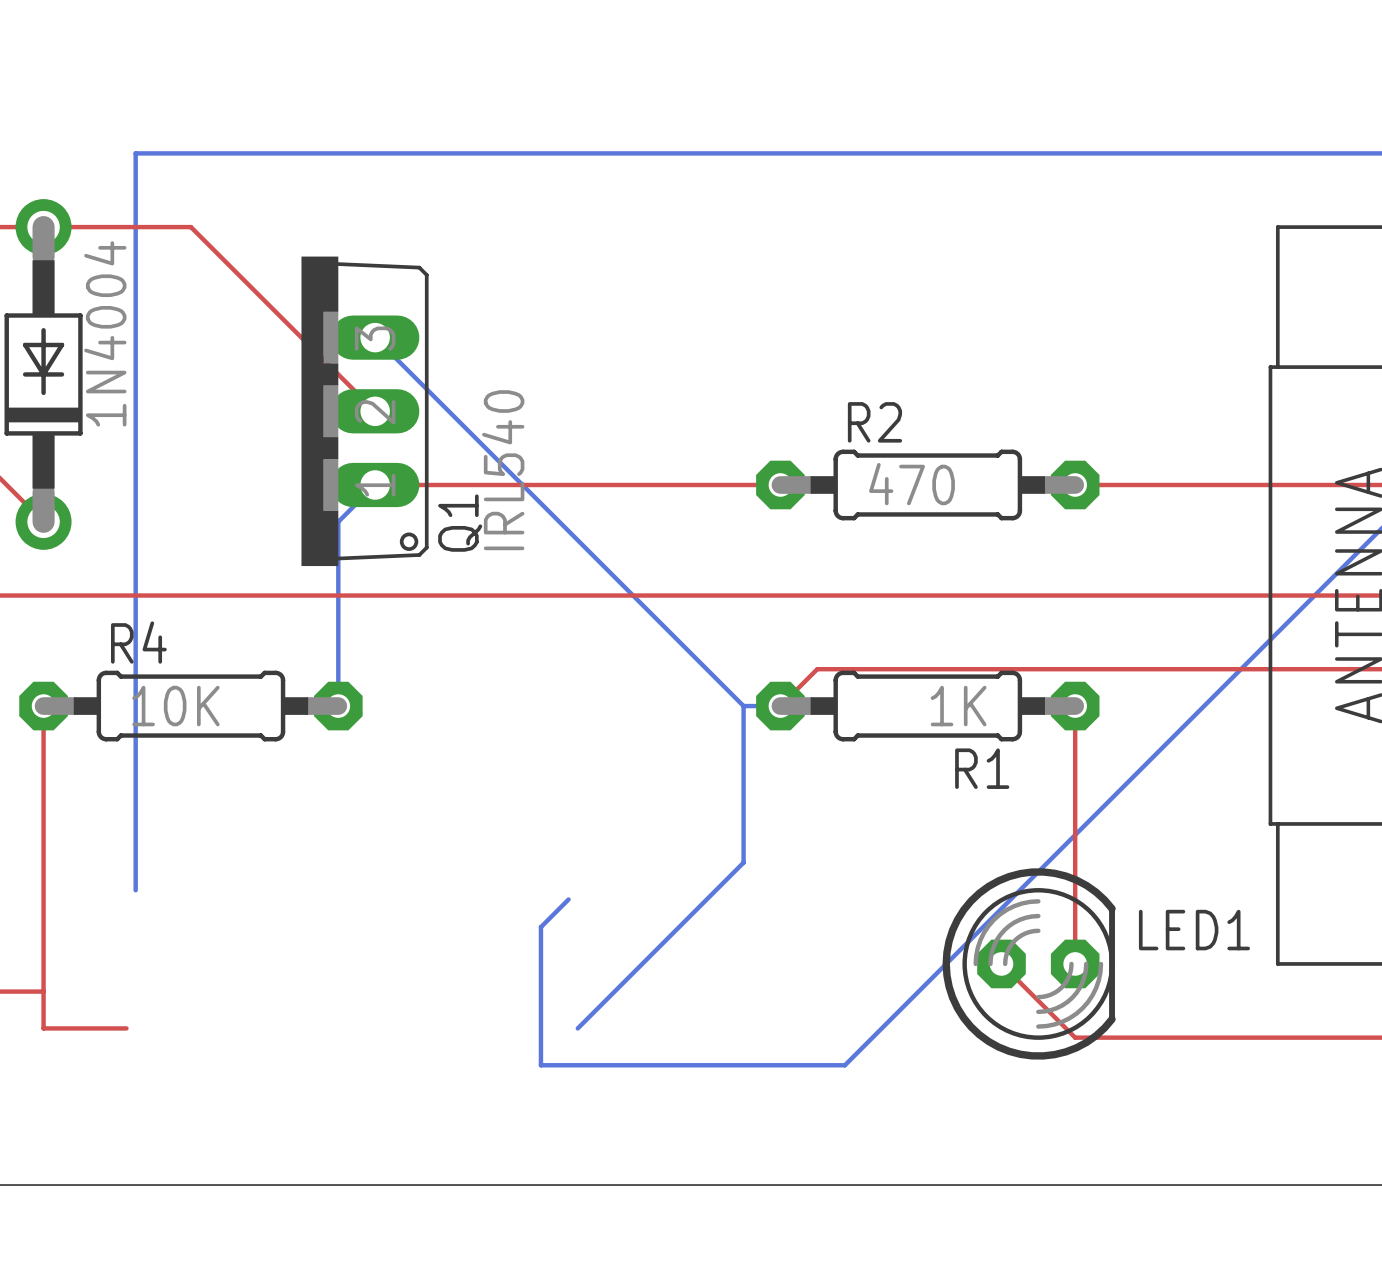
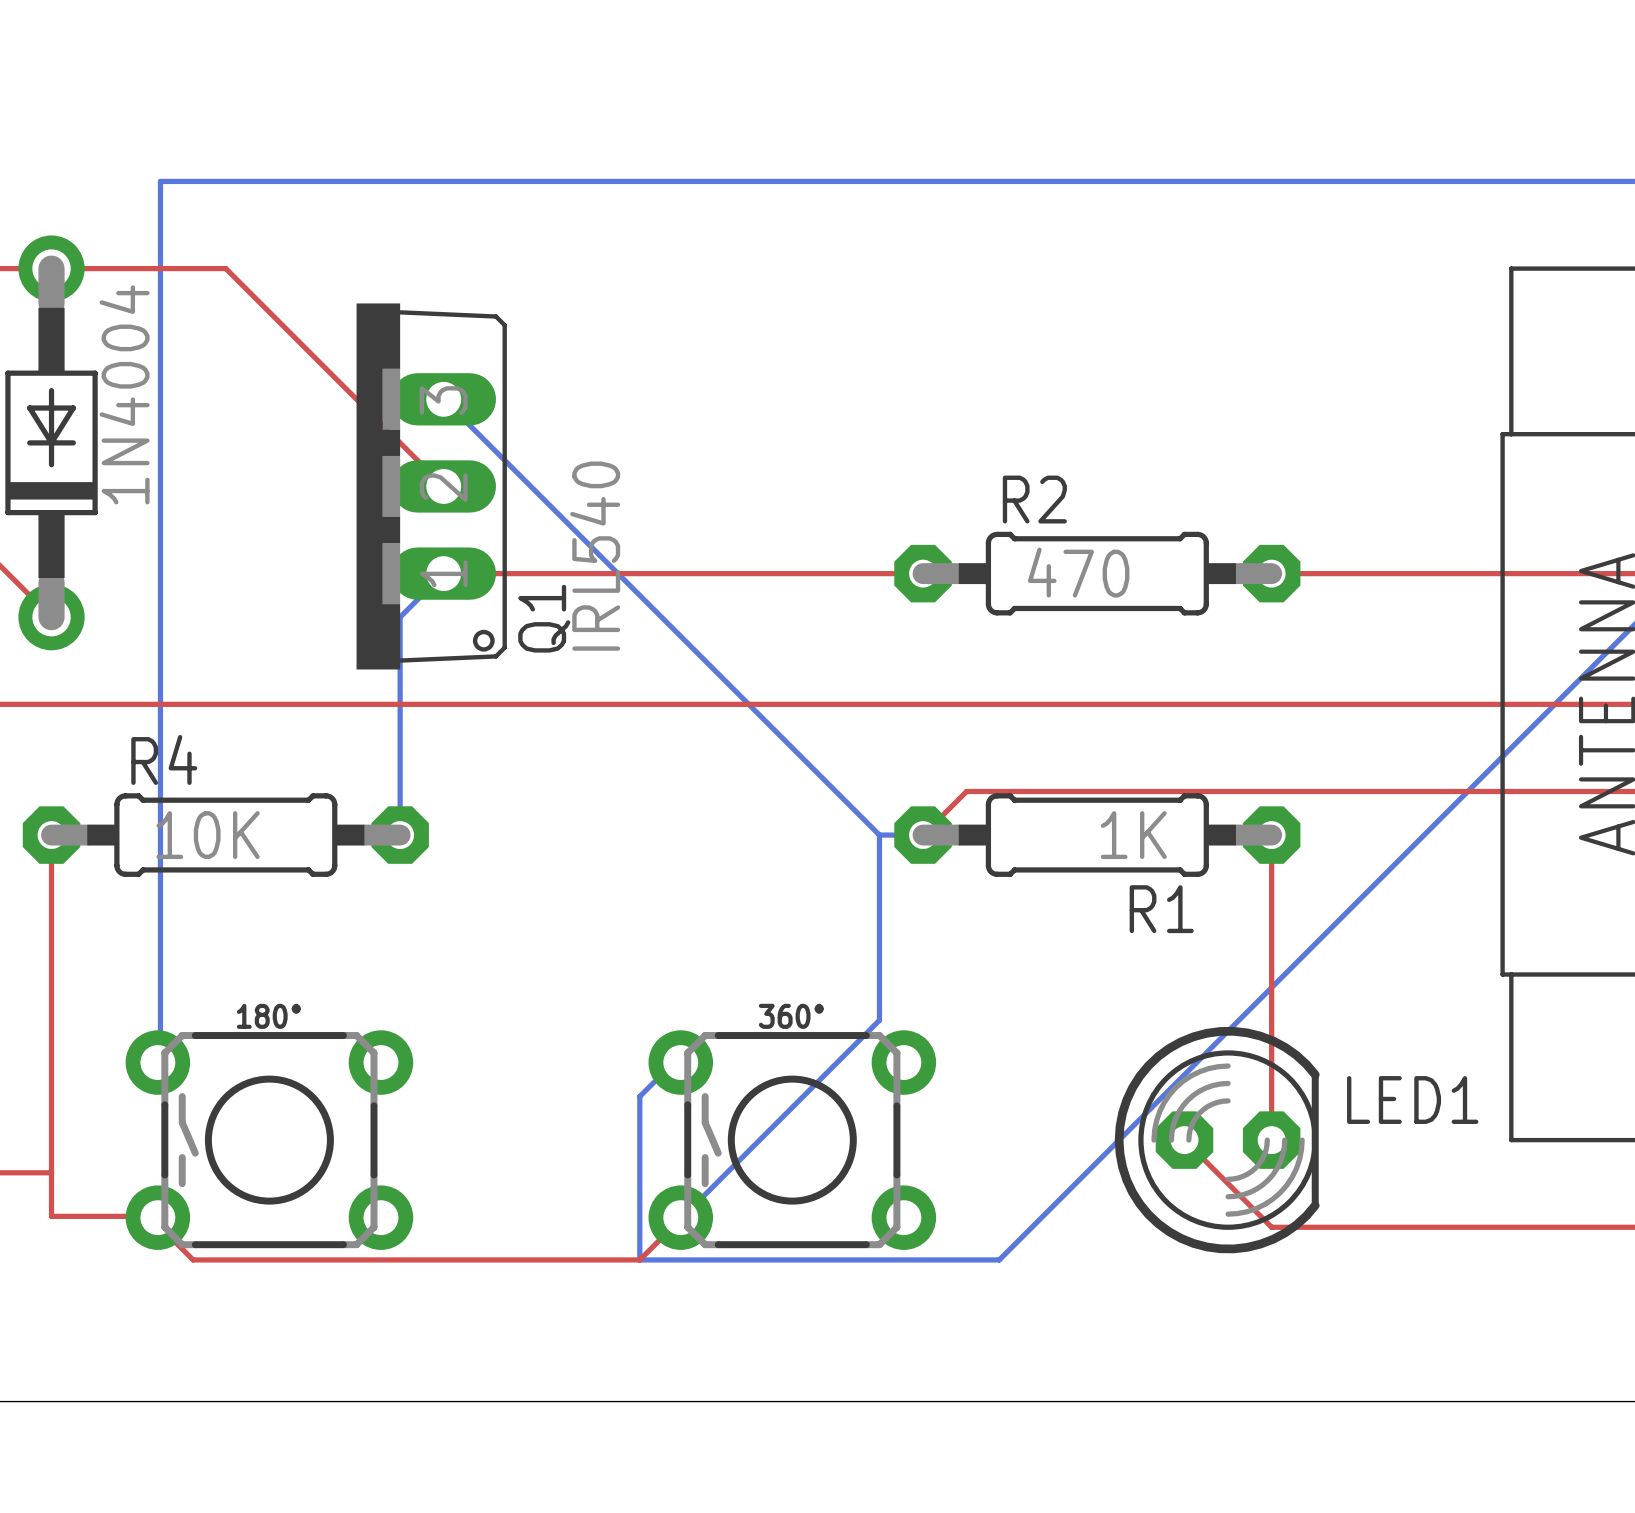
180°: none -> (269, 1140)
360°: none -> (792, 1140)
top track: none -> (149, 1216) (157, 1217) (160, 1227) (193, 1259) (639, 1259) (680, 1217)

